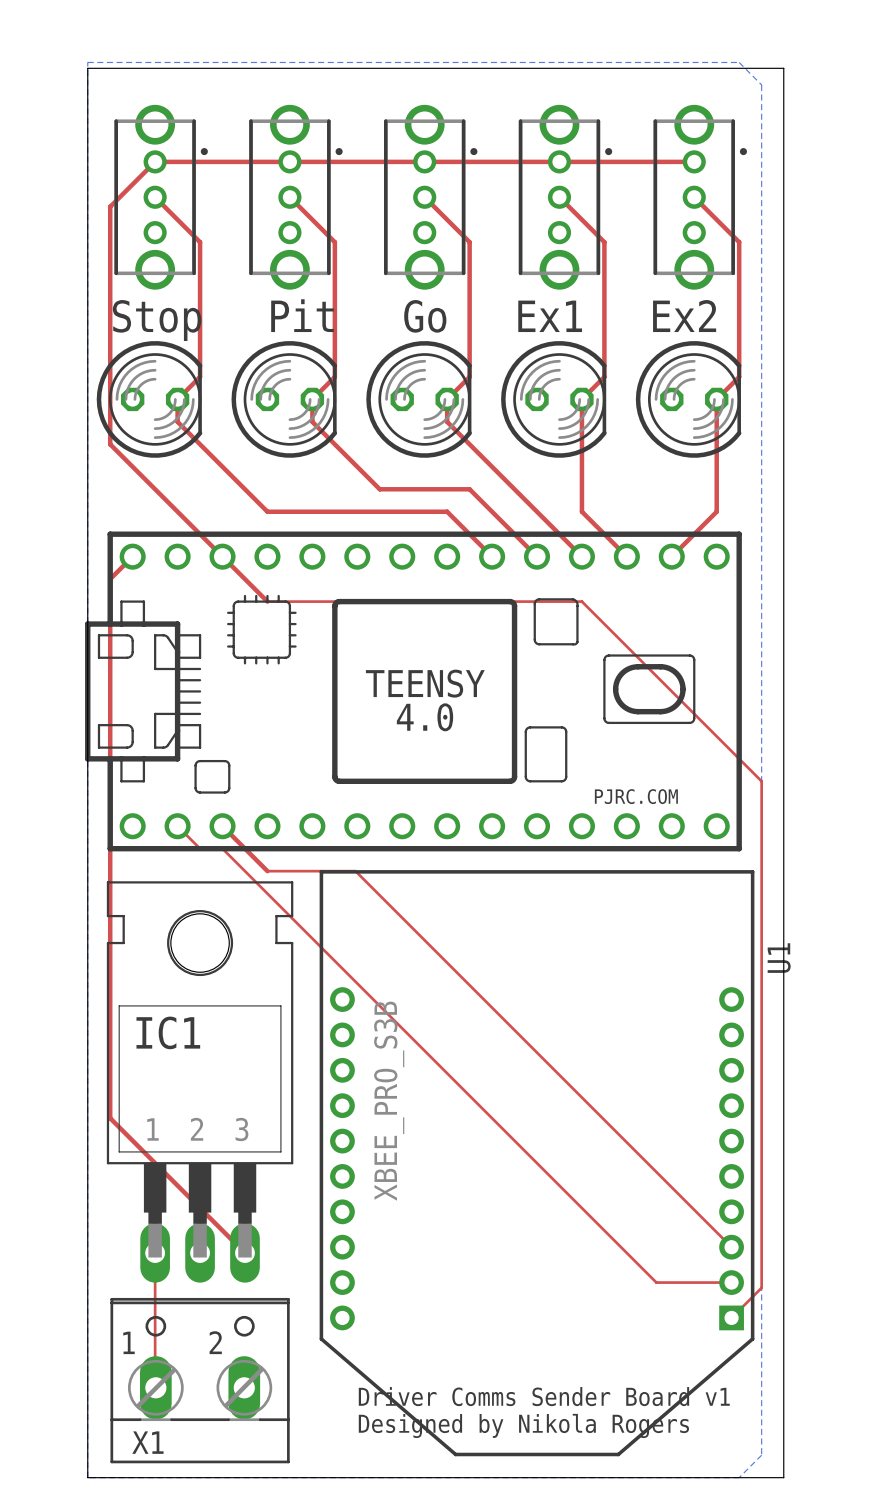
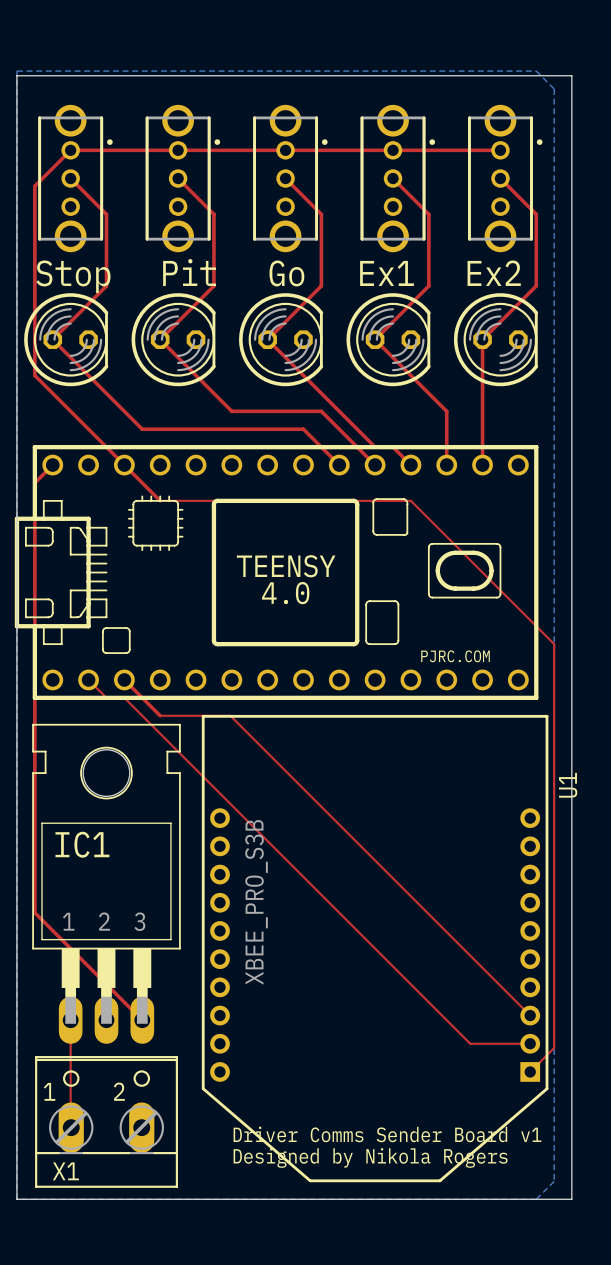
top track: (200, 332) (200, 376) (177, 399) (177, 421) (267, 511) -> (106, 285) (52, 339) (142, 429) (160, 429)
top track: (334, 332) (334, 376) (312, 399) (312, 421) (379, 489) -> (213, 285) (160, 339) (231, 411) (249, 411)
top track: (469, 332) (469, 376) (447, 399) (447, 421) (559, 534) -> (321, 285) (267, 339) (375, 447) (393, 447)
top track: (604, 332) (604, 376) (581, 399) (581, 511) (626, 556) -> (428, 285) (375, 339) (446, 411) (446, 465)
top track: (739, 332) (739, 376) (716, 399) (716, 511) (671, 556) -> (536, 285) (482, 339) (482, 465)

